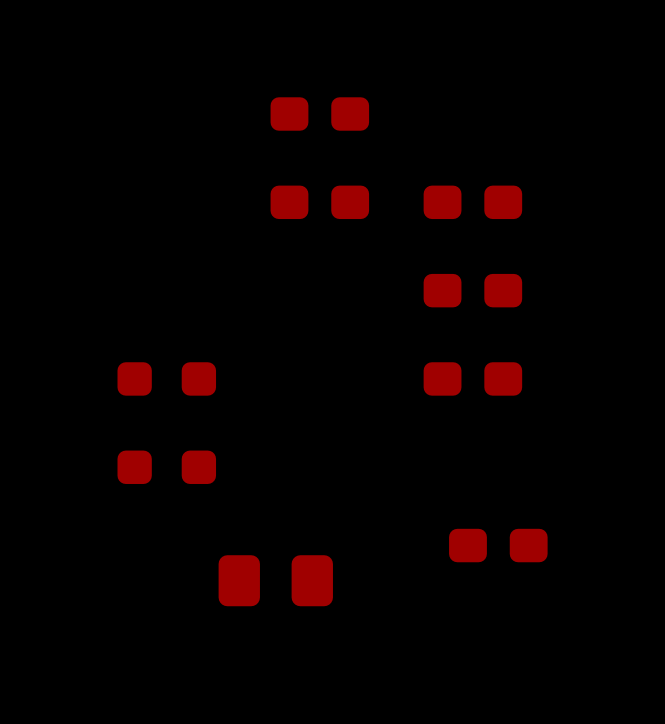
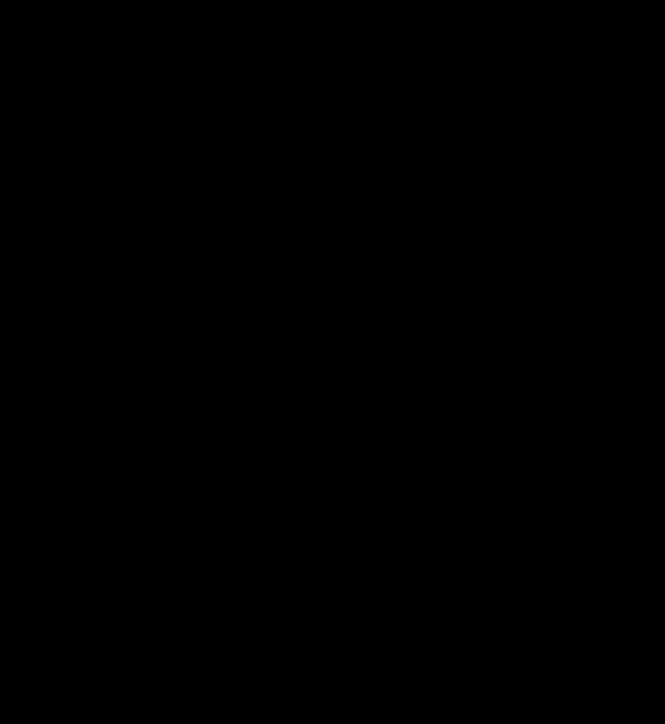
part: (319, 114) -> none
part: (319, 202) -> none
part: (472, 202) -> none
part: (472, 290) -> none
part: (166, 378) -> none
part: (472, 378) -> none
part: (166, 467) -> none
part: (498, 545) -> none
part: (275, 580) -> none

